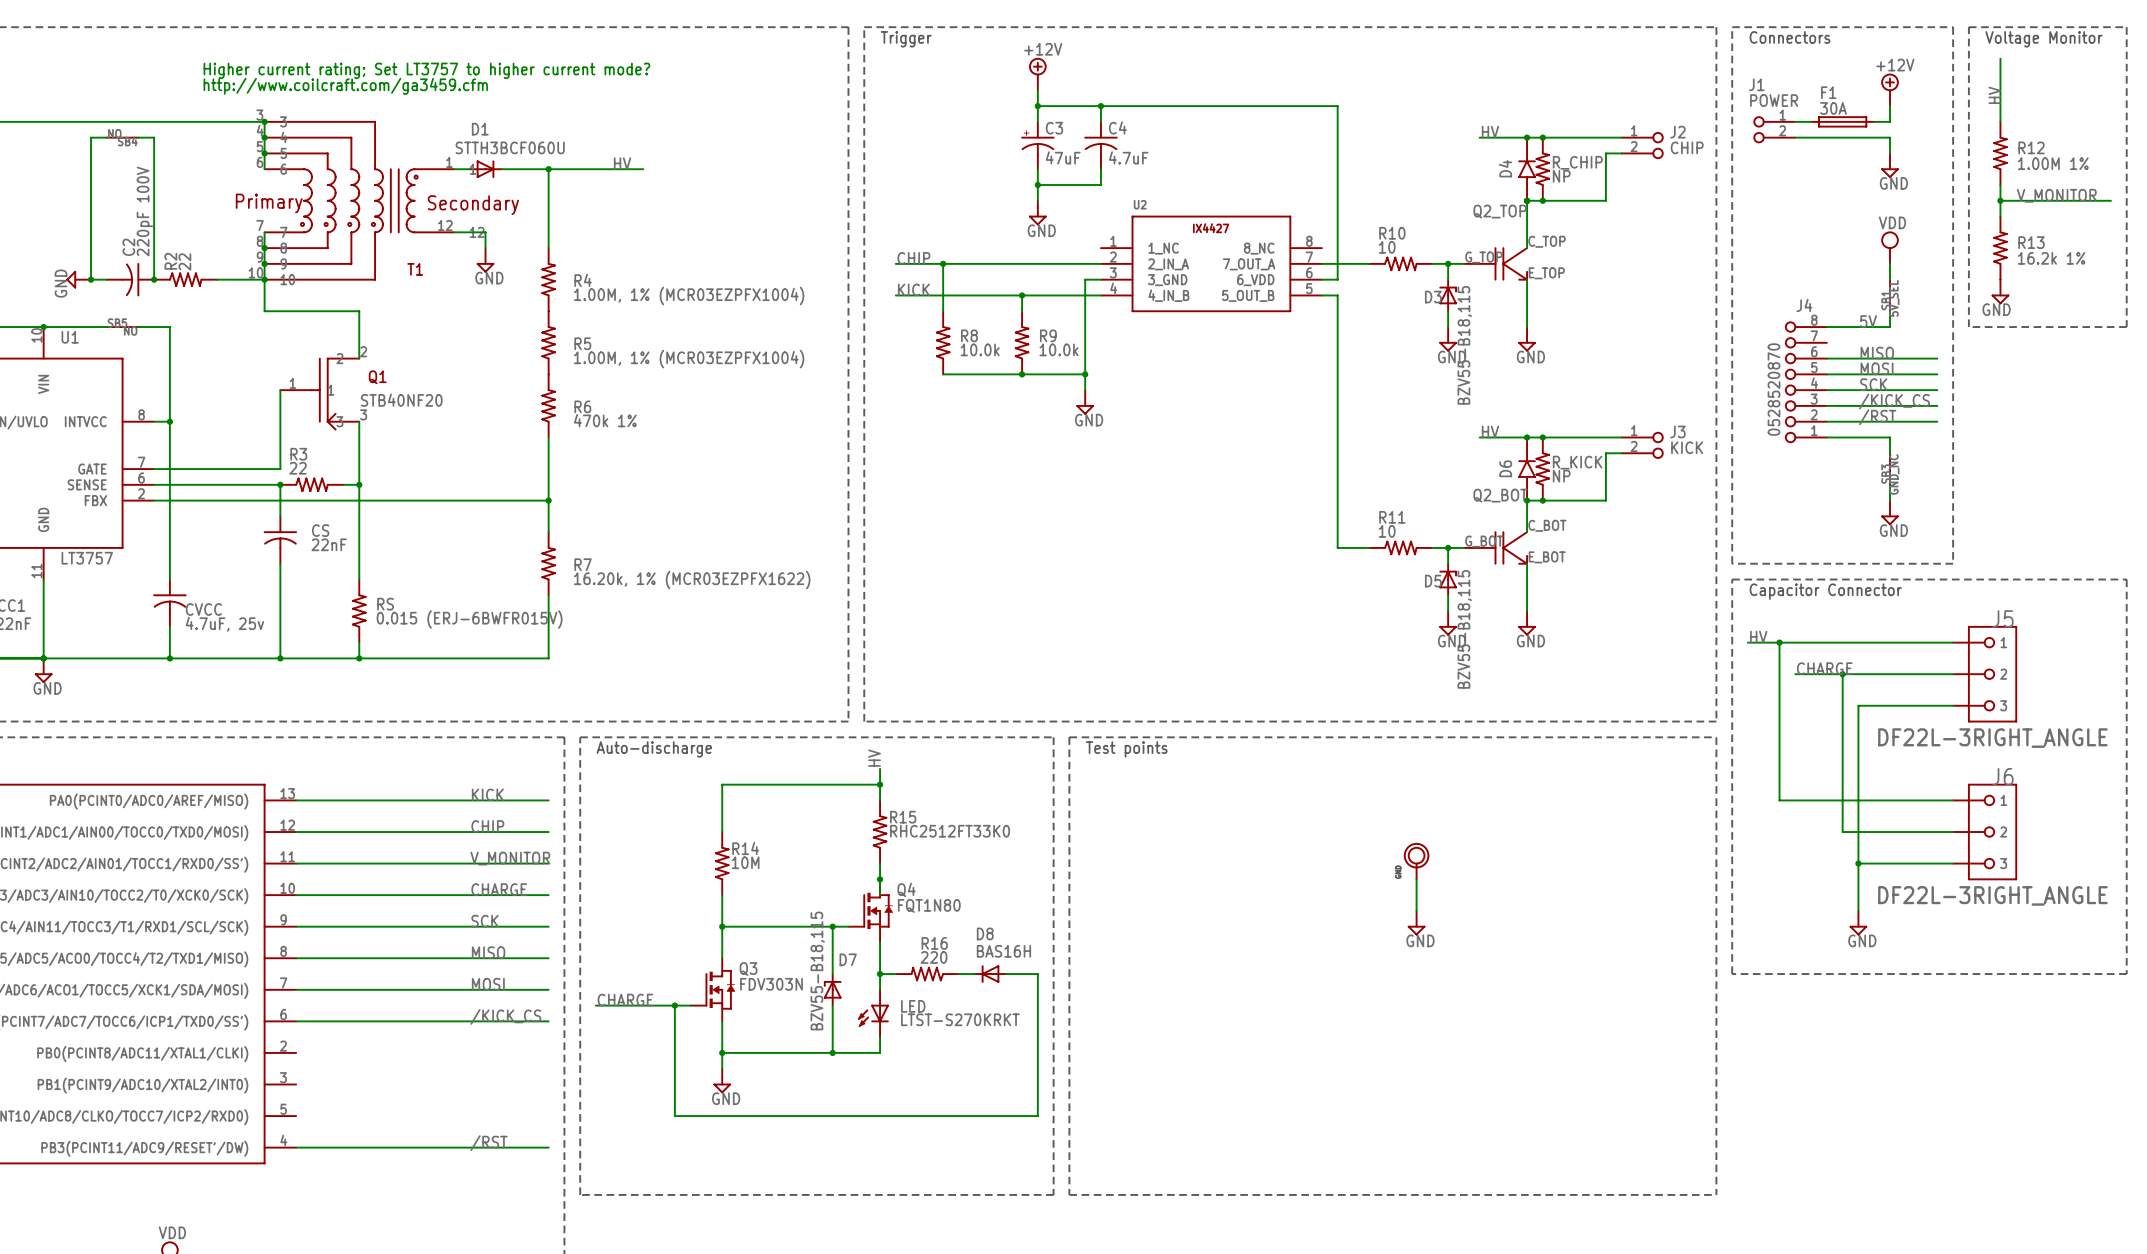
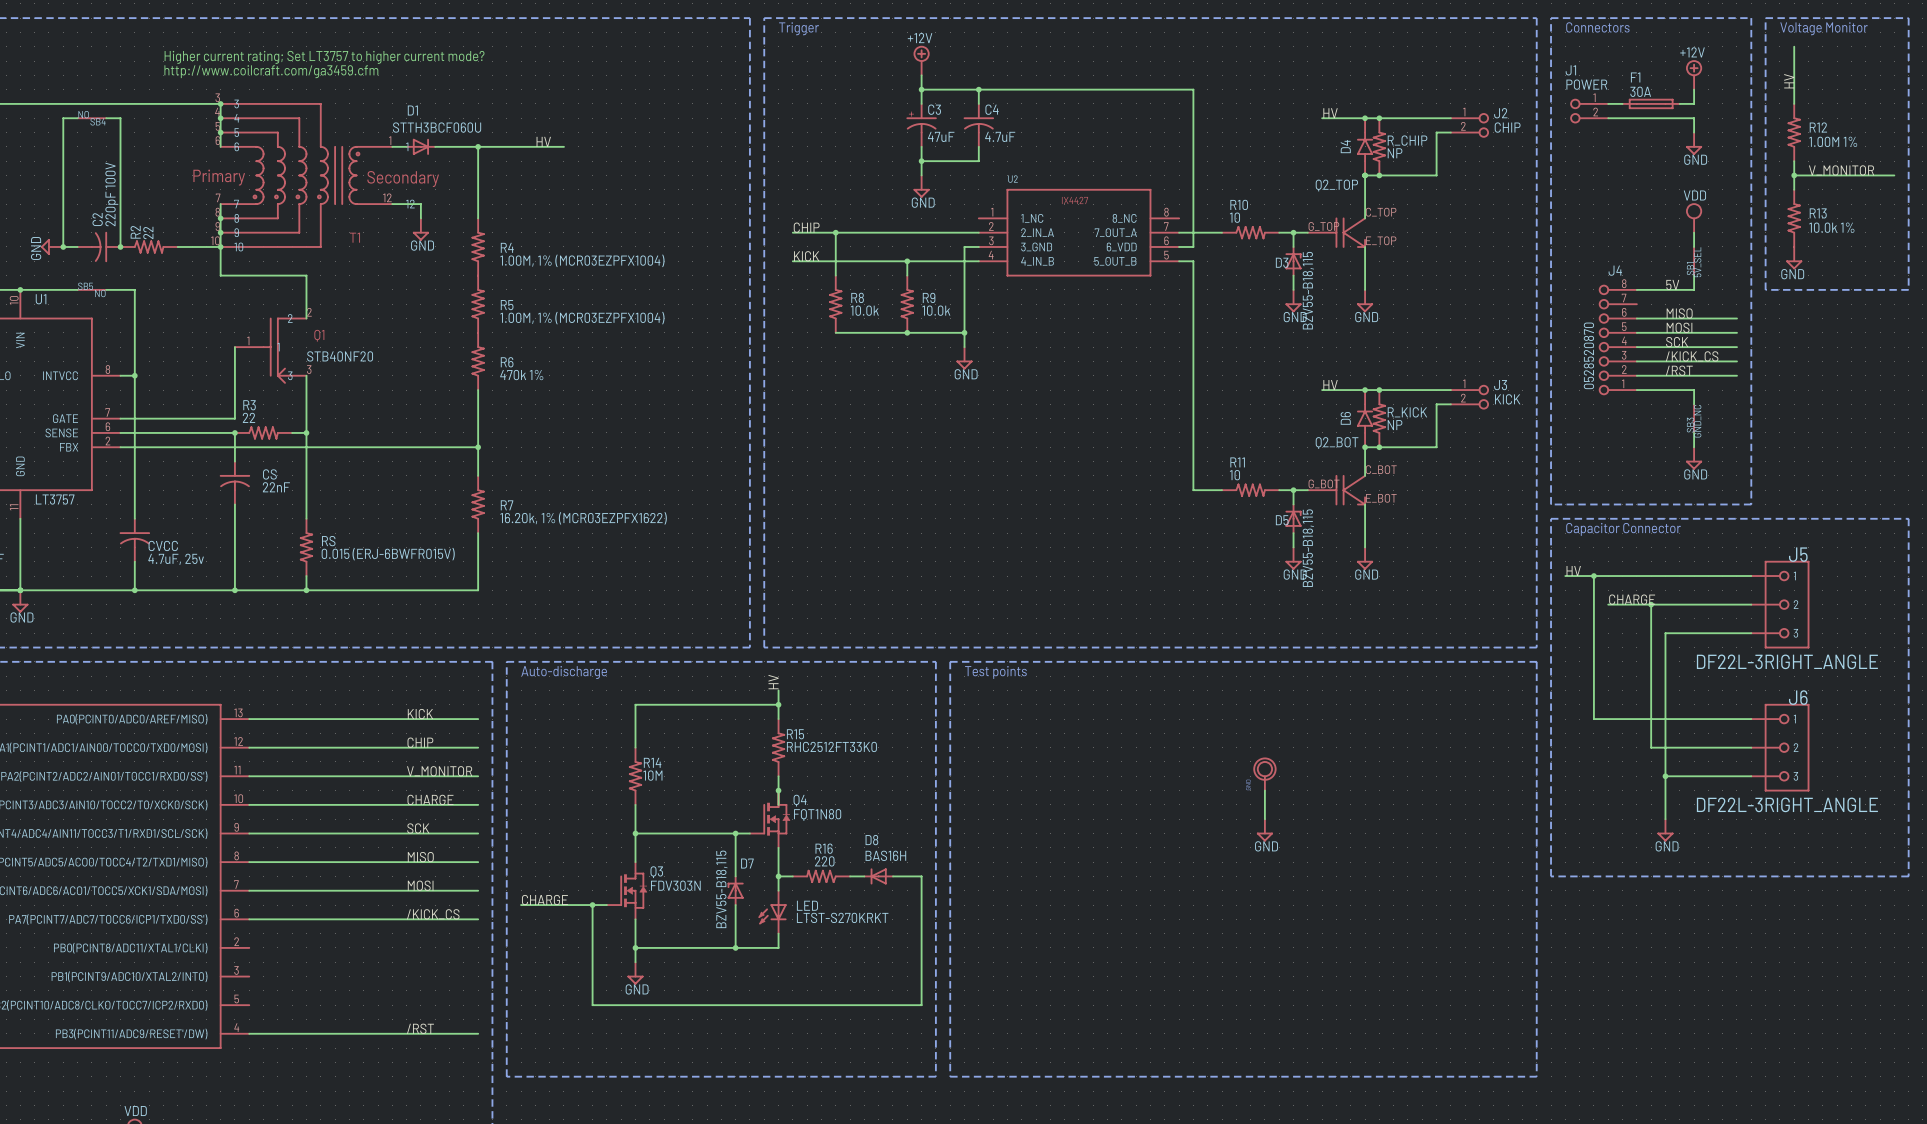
R13 value: 16.2k 1% (2051, 258) -> 10.0k 1% (1831, 227)

